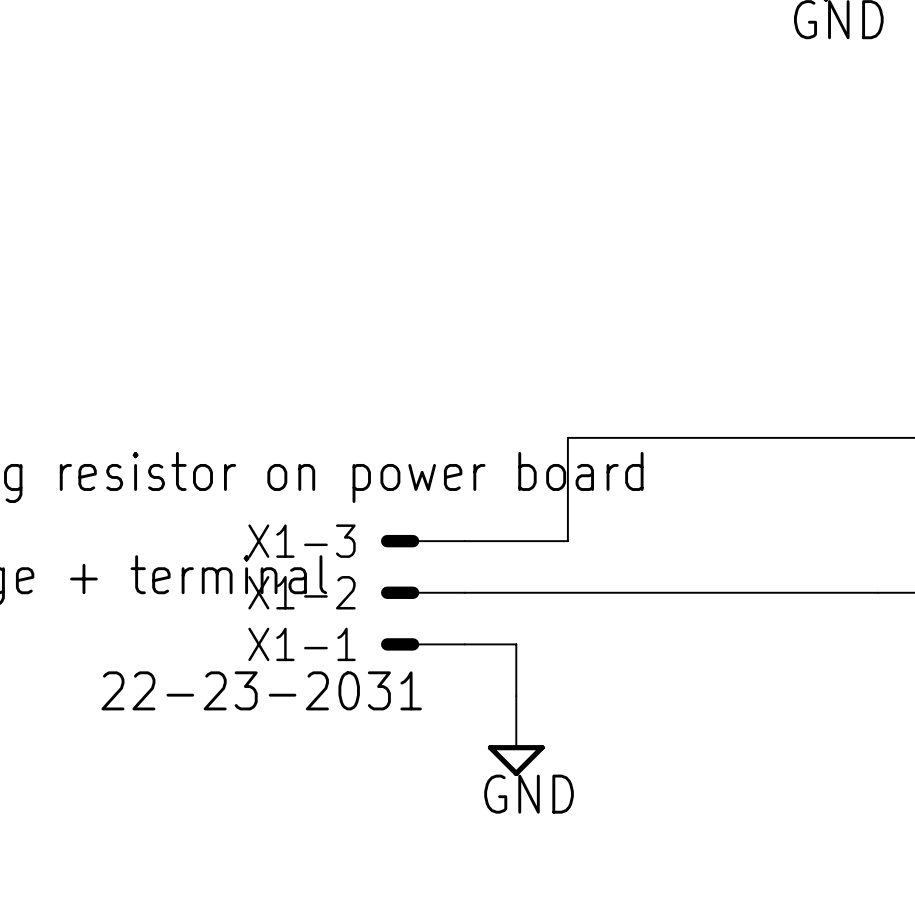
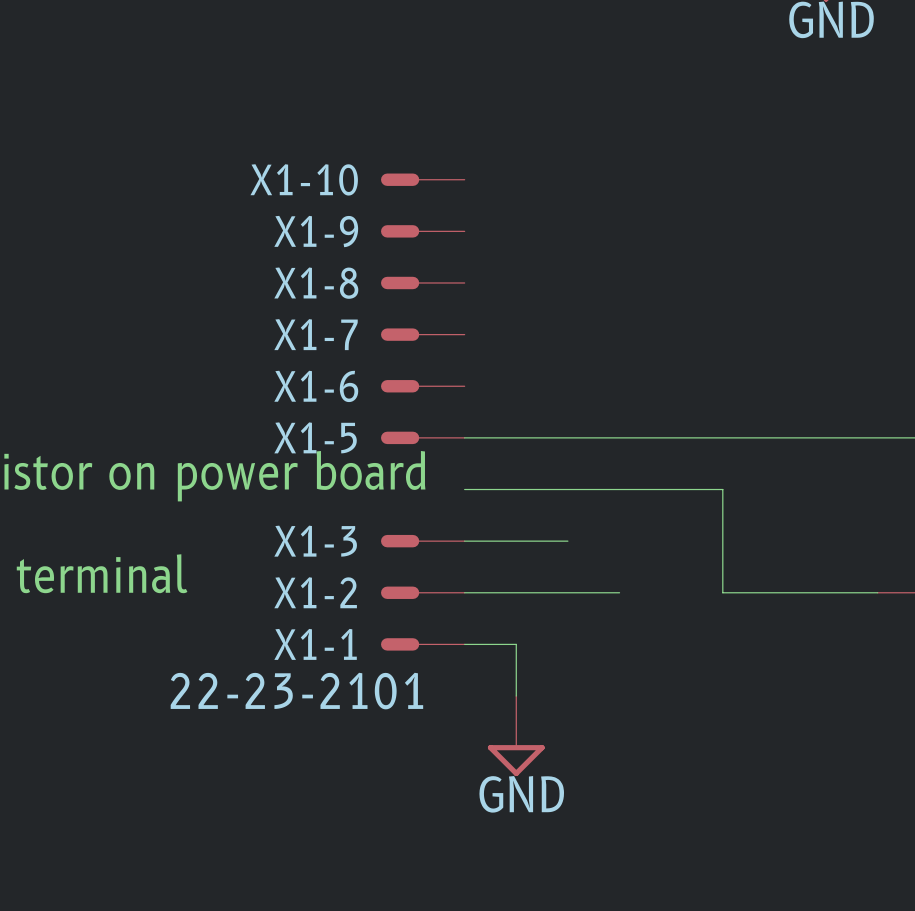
X1-10: none -> (422, 179)
X1-9: none -> (422, 231)
X1-8: none -> (422, 282)
X1-7: none -> (422, 334)
X1-6: none -> (422, 386)
X1-5: none -> (422, 437)
wire: (567, 437) (567, 541) -> (567, 437) (464, 437)
wire: (619, 592) (722, 592) -> (464, 489) (722, 489) (722, 592)
X1-1 value: 22-23-2031 (261, 690) -> 22-23-2101 (296, 691)

